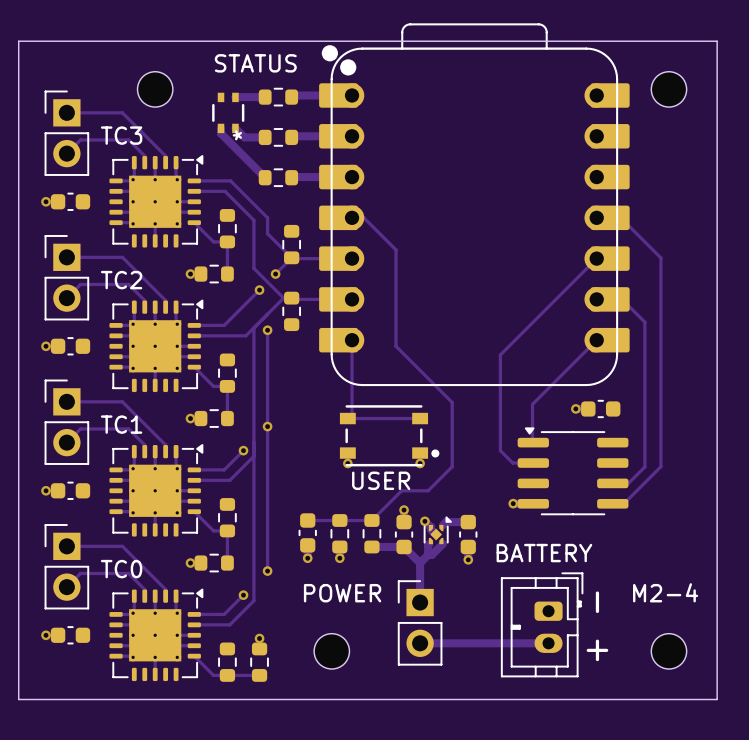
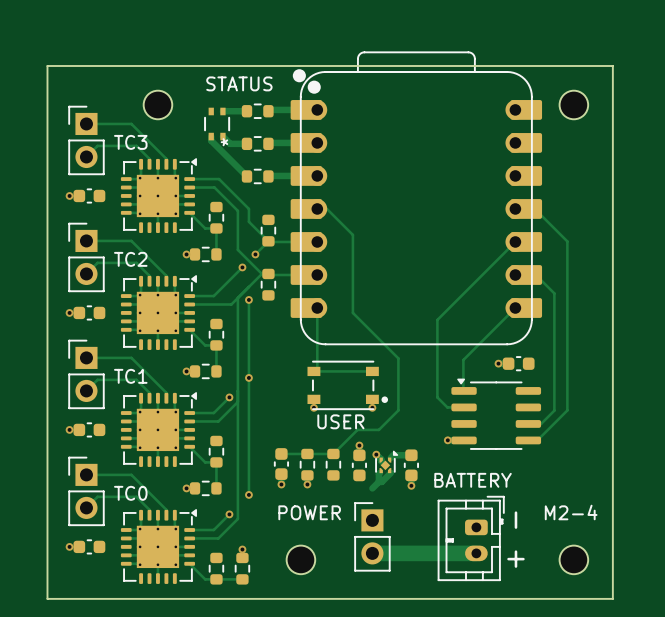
track: (371, 546) (404, 546) (420, 563) (420, 602) -> none
track width: thin (420, 643) (548, 643) -> thick (372, 553) (476, 553)

